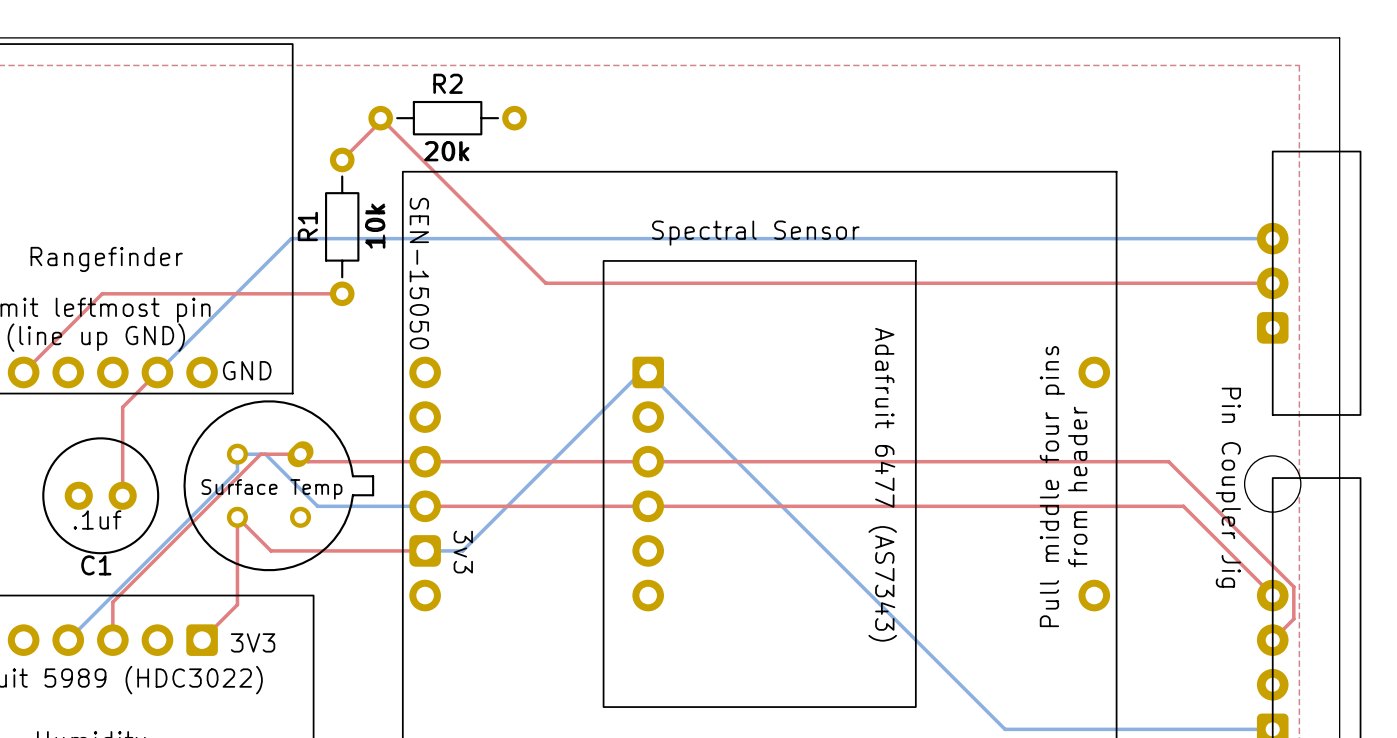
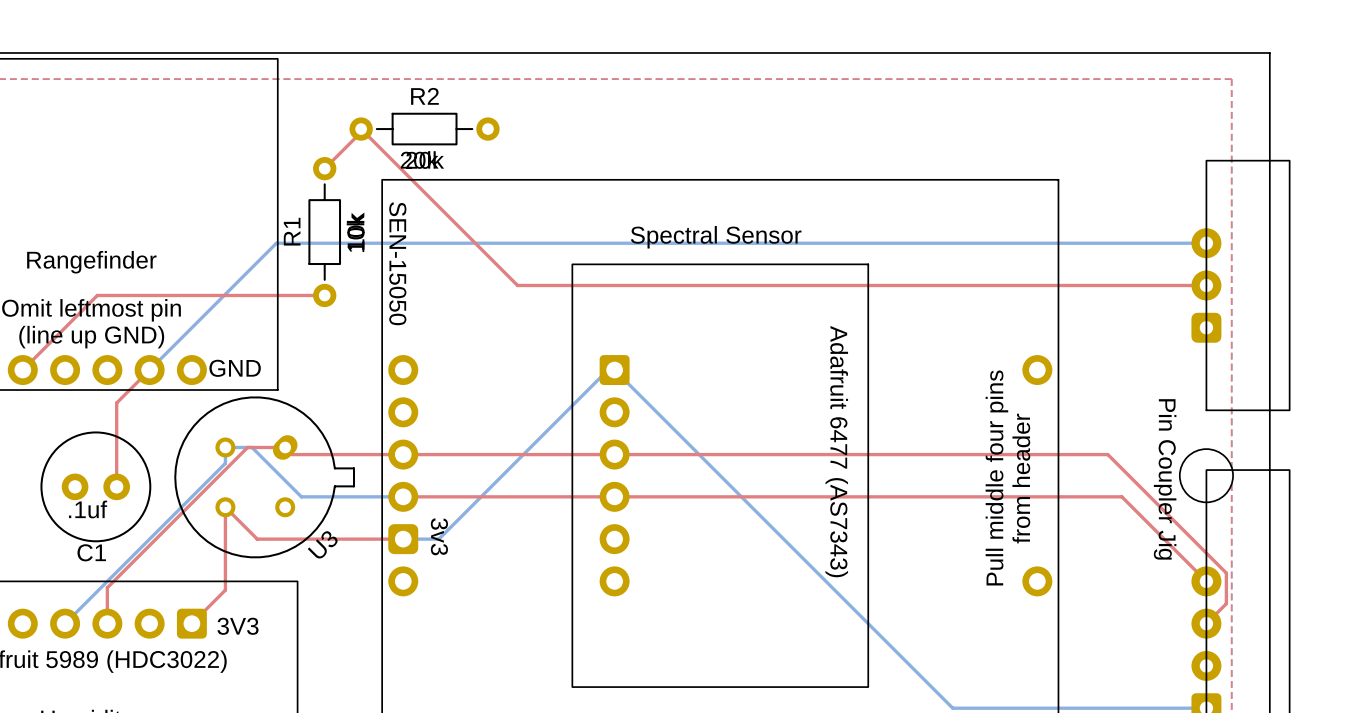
text: Surface Temp (271, 489) -> none
U3 name: none -> U3 (322, 544)

